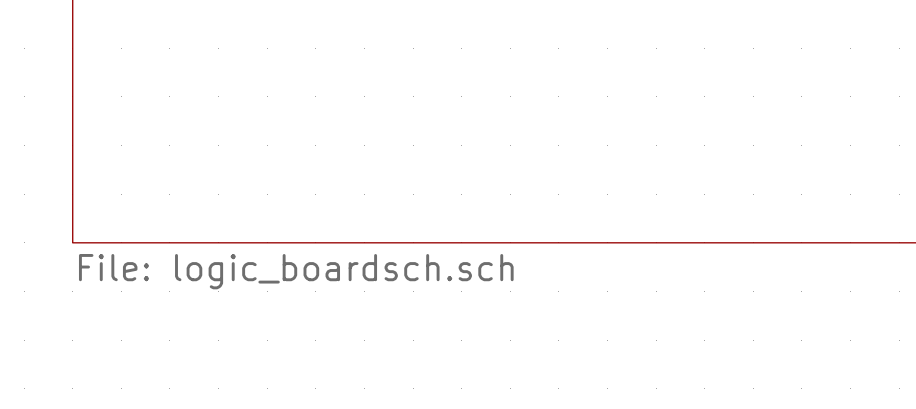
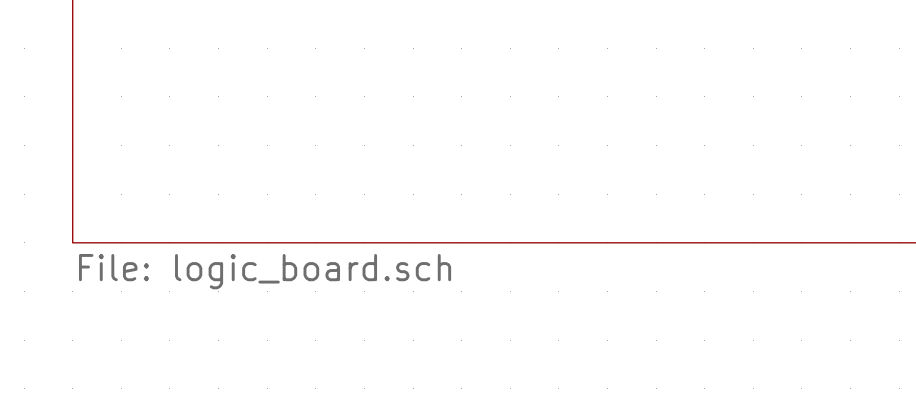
sheet value: File: logic_boardsch.sch (296, 271) -> File: logic_board.sch (265, 271)

